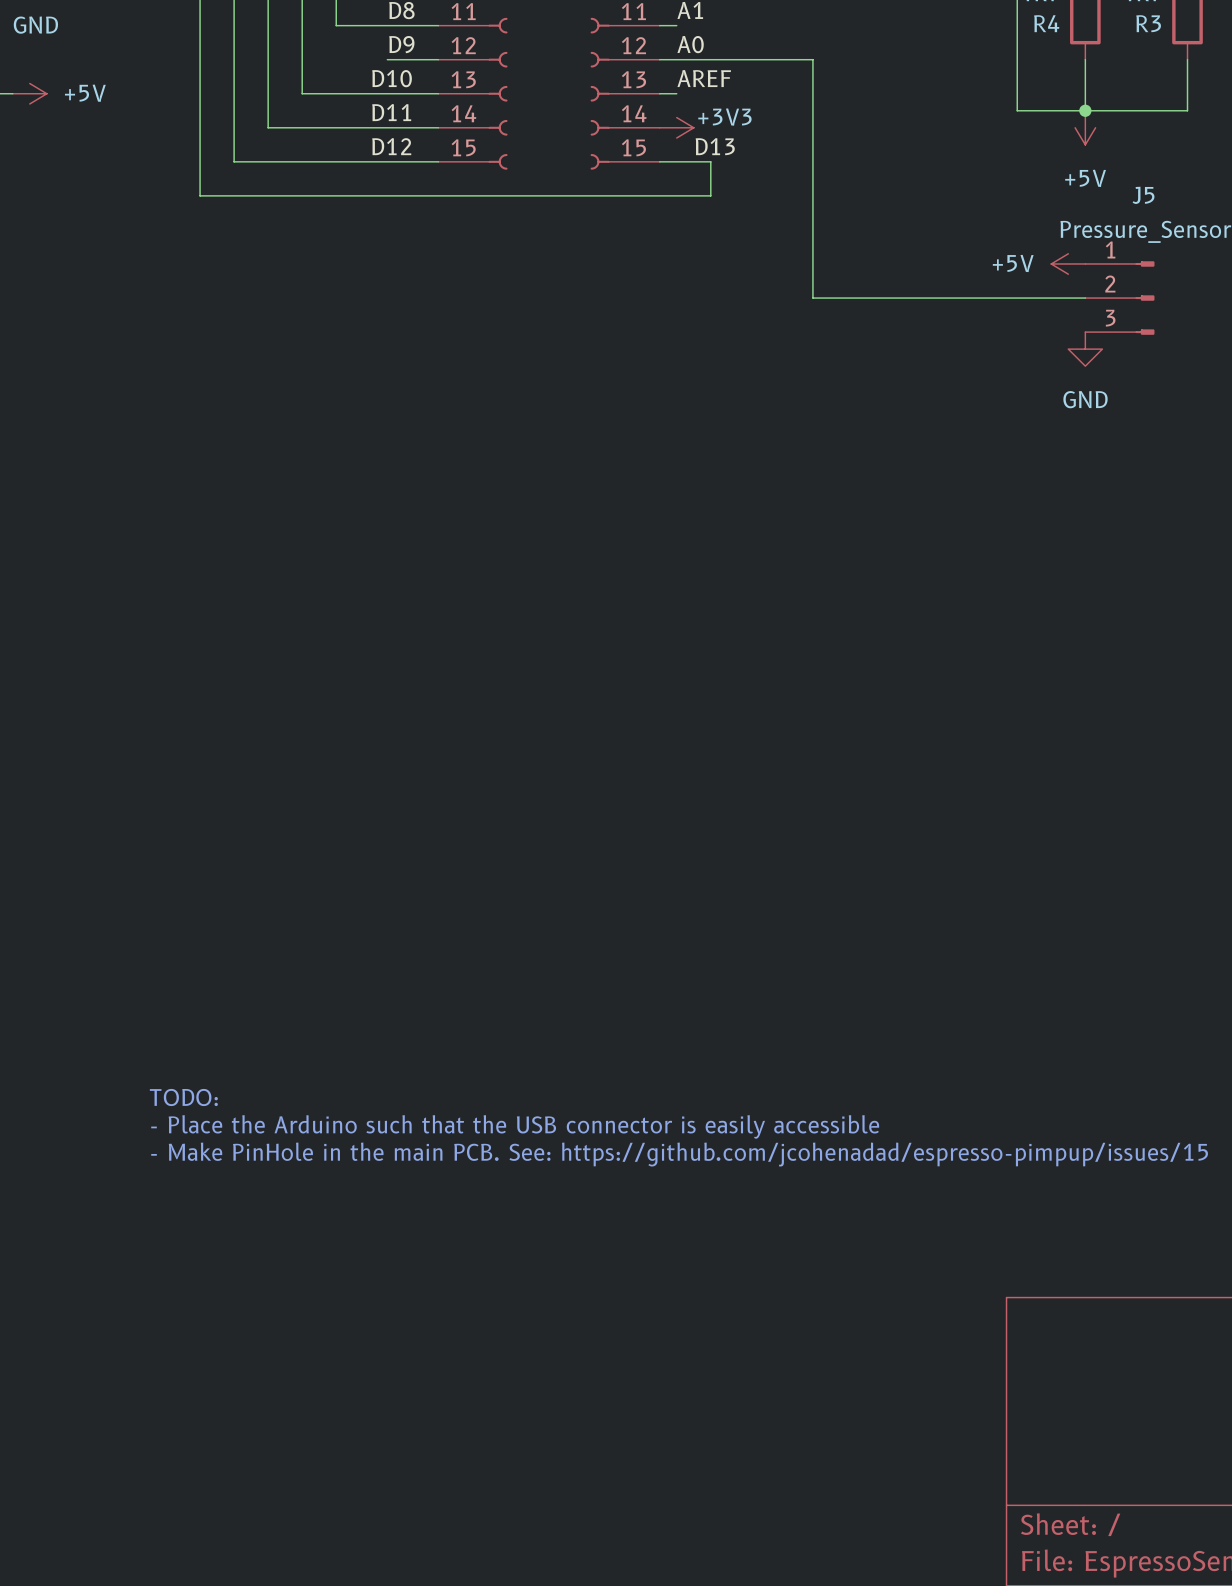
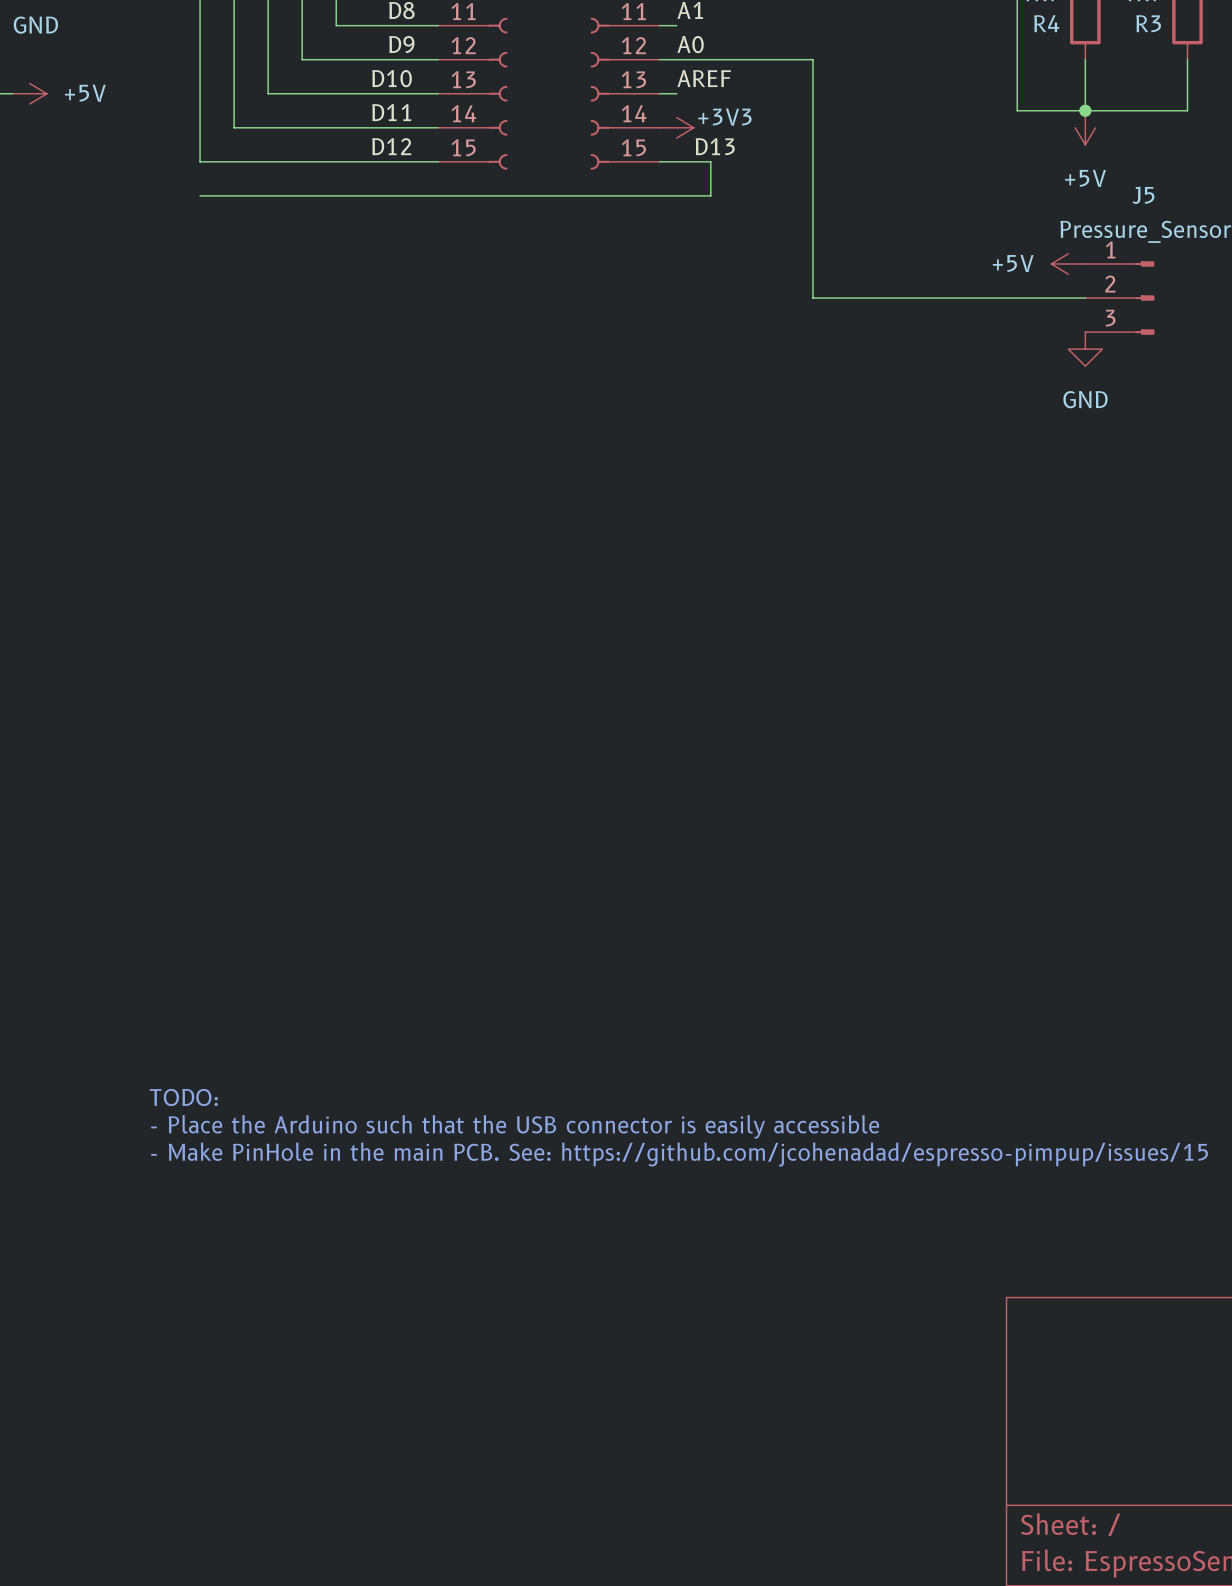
wire: (302, 59) (302, 93) -> (302, 59) (387, 59)
wire: (268, 93) (268, 127) -> (268, 93) (302, 93)
wire: (234, 127) (234, 161) -> (234, 127) (268, 127)
wire: (200, 161) (200, 195) -> (200, 161) (234, 161)

